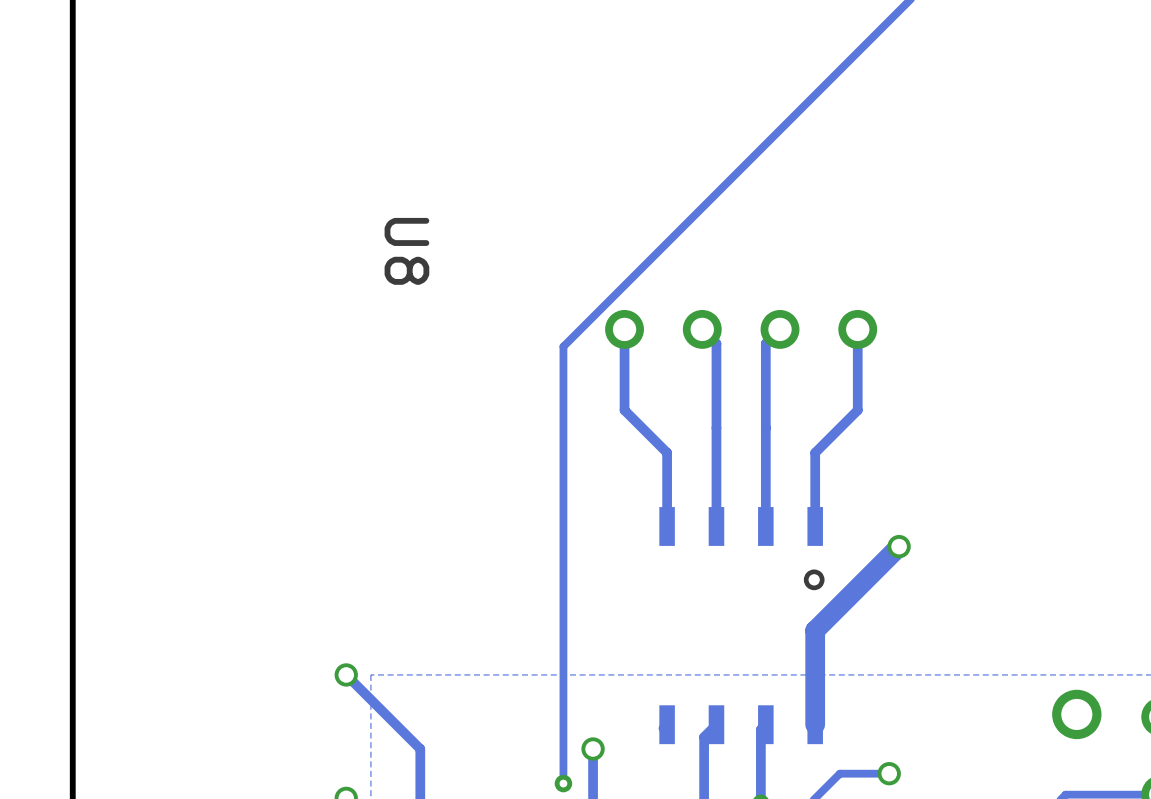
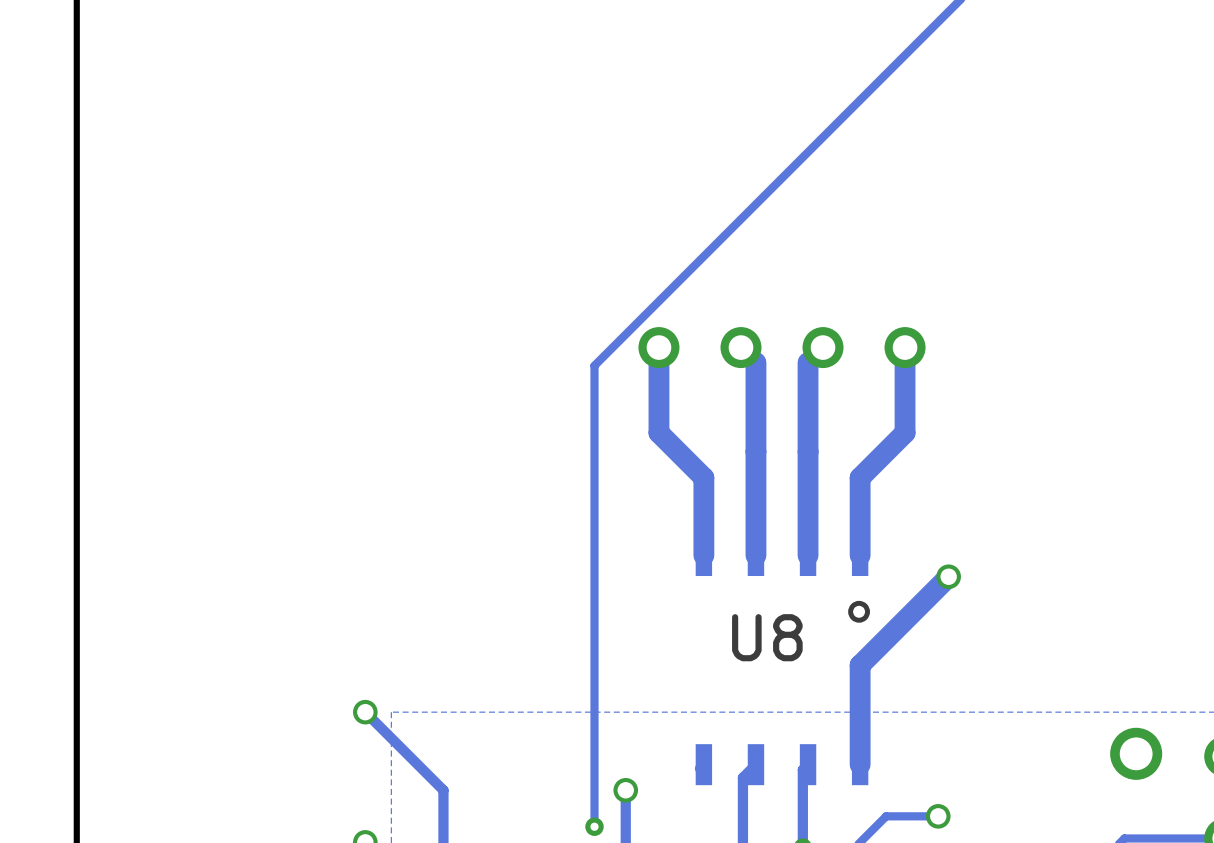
U8 name rotation: 0° (406, 251) -> 90° counterclockwise (767, 637)
U8 name position: U8 (406, 251) -> U8 (767, 637)
track width: thin (624, 329) (624, 410) (667, 452) (667, 526) -> thick (658, 347) (658, 432) (703, 477) (703, 555)
track width: thin (857, 329) (857, 410) (815, 452) (815, 526) -> thick (905, 347) (905, 432) (860, 477) (860, 555)
track width: thin (716, 343) (716, 526) -> thick (755, 362) (755, 555)
track width: thin (765, 343) (765, 526) -> thick (808, 362) (808, 555)

